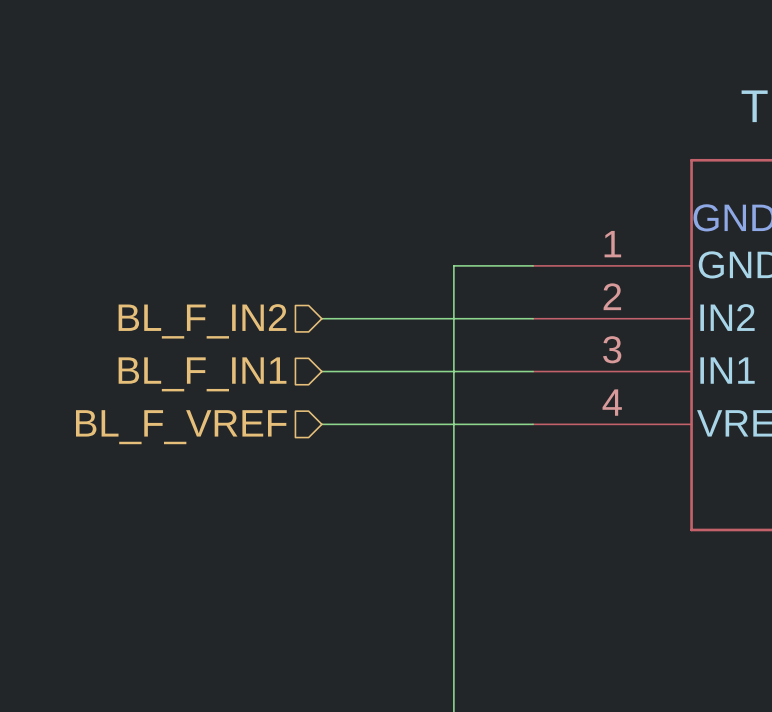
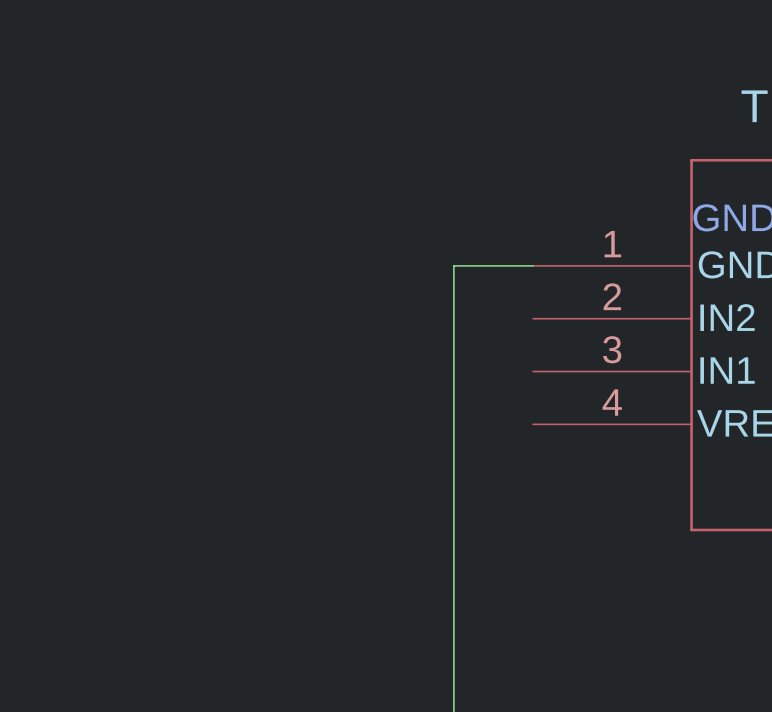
wire: (321, 318) (533, 318) -> none
hierarchical label: BL_F_IN2 (202, 321) -> none
wire: (321, 371) (533, 371) -> none
hierarchical label: BL_F_IN1 (202, 374) -> none
wire: (321, 424) (533, 424) -> none
hierarchical label: BL_F_VREF (181, 427) -> none

